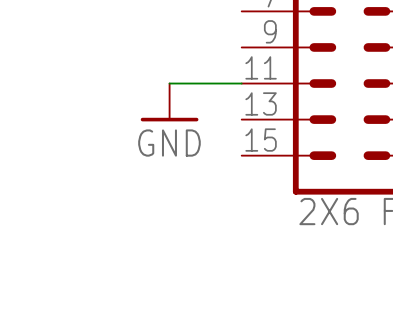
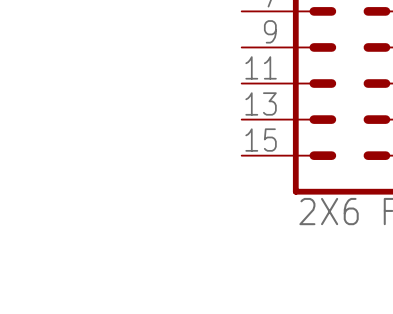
wire: (169, 83) (241, 83) -> none
power symbol: GND (169, 102) -> none

